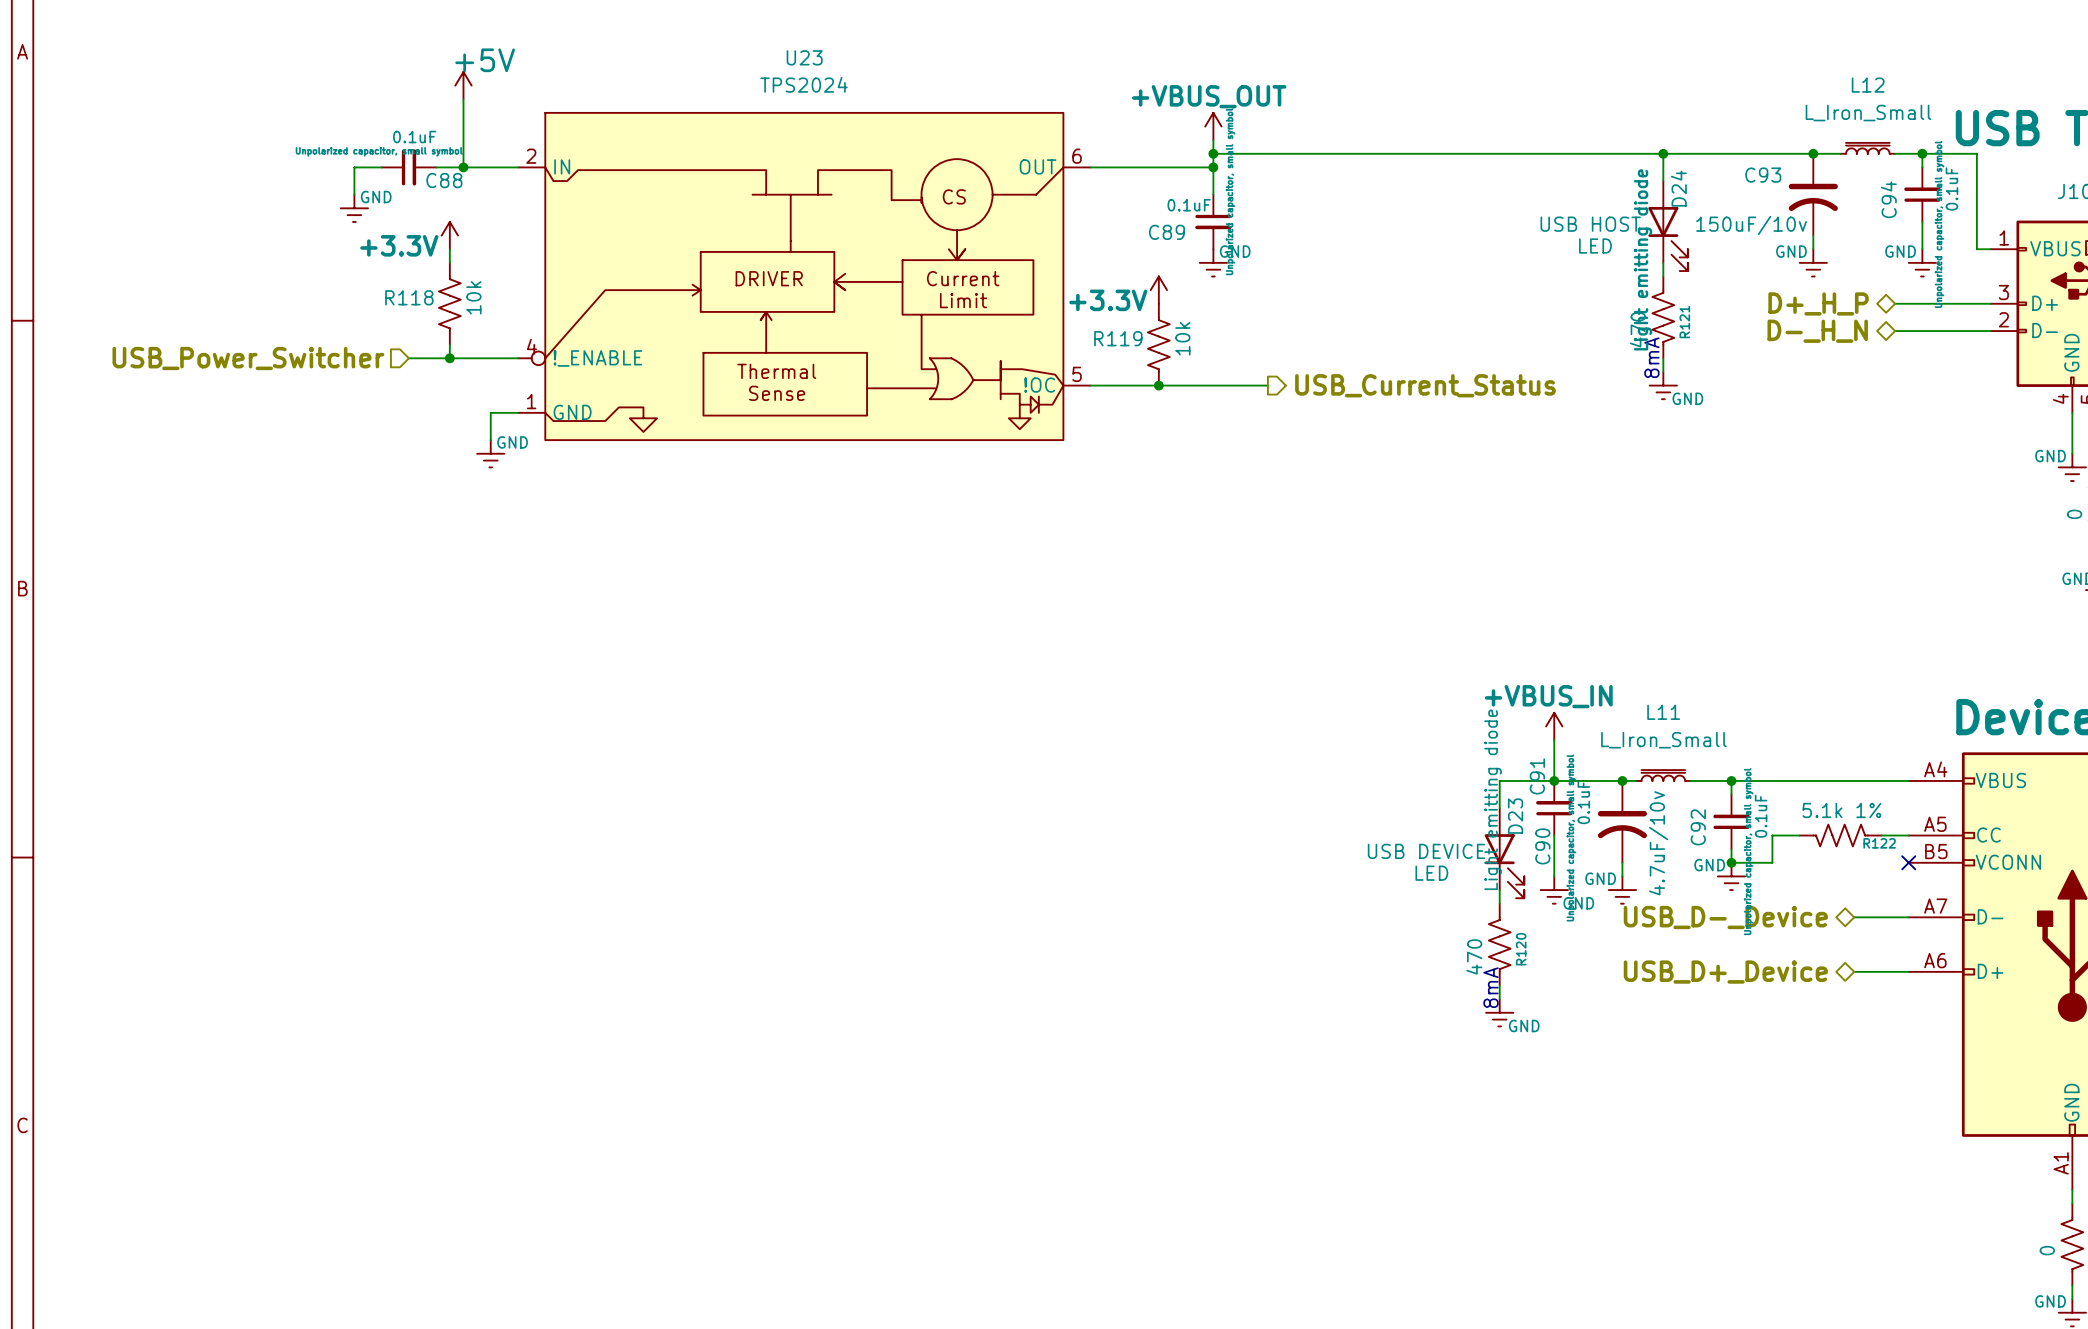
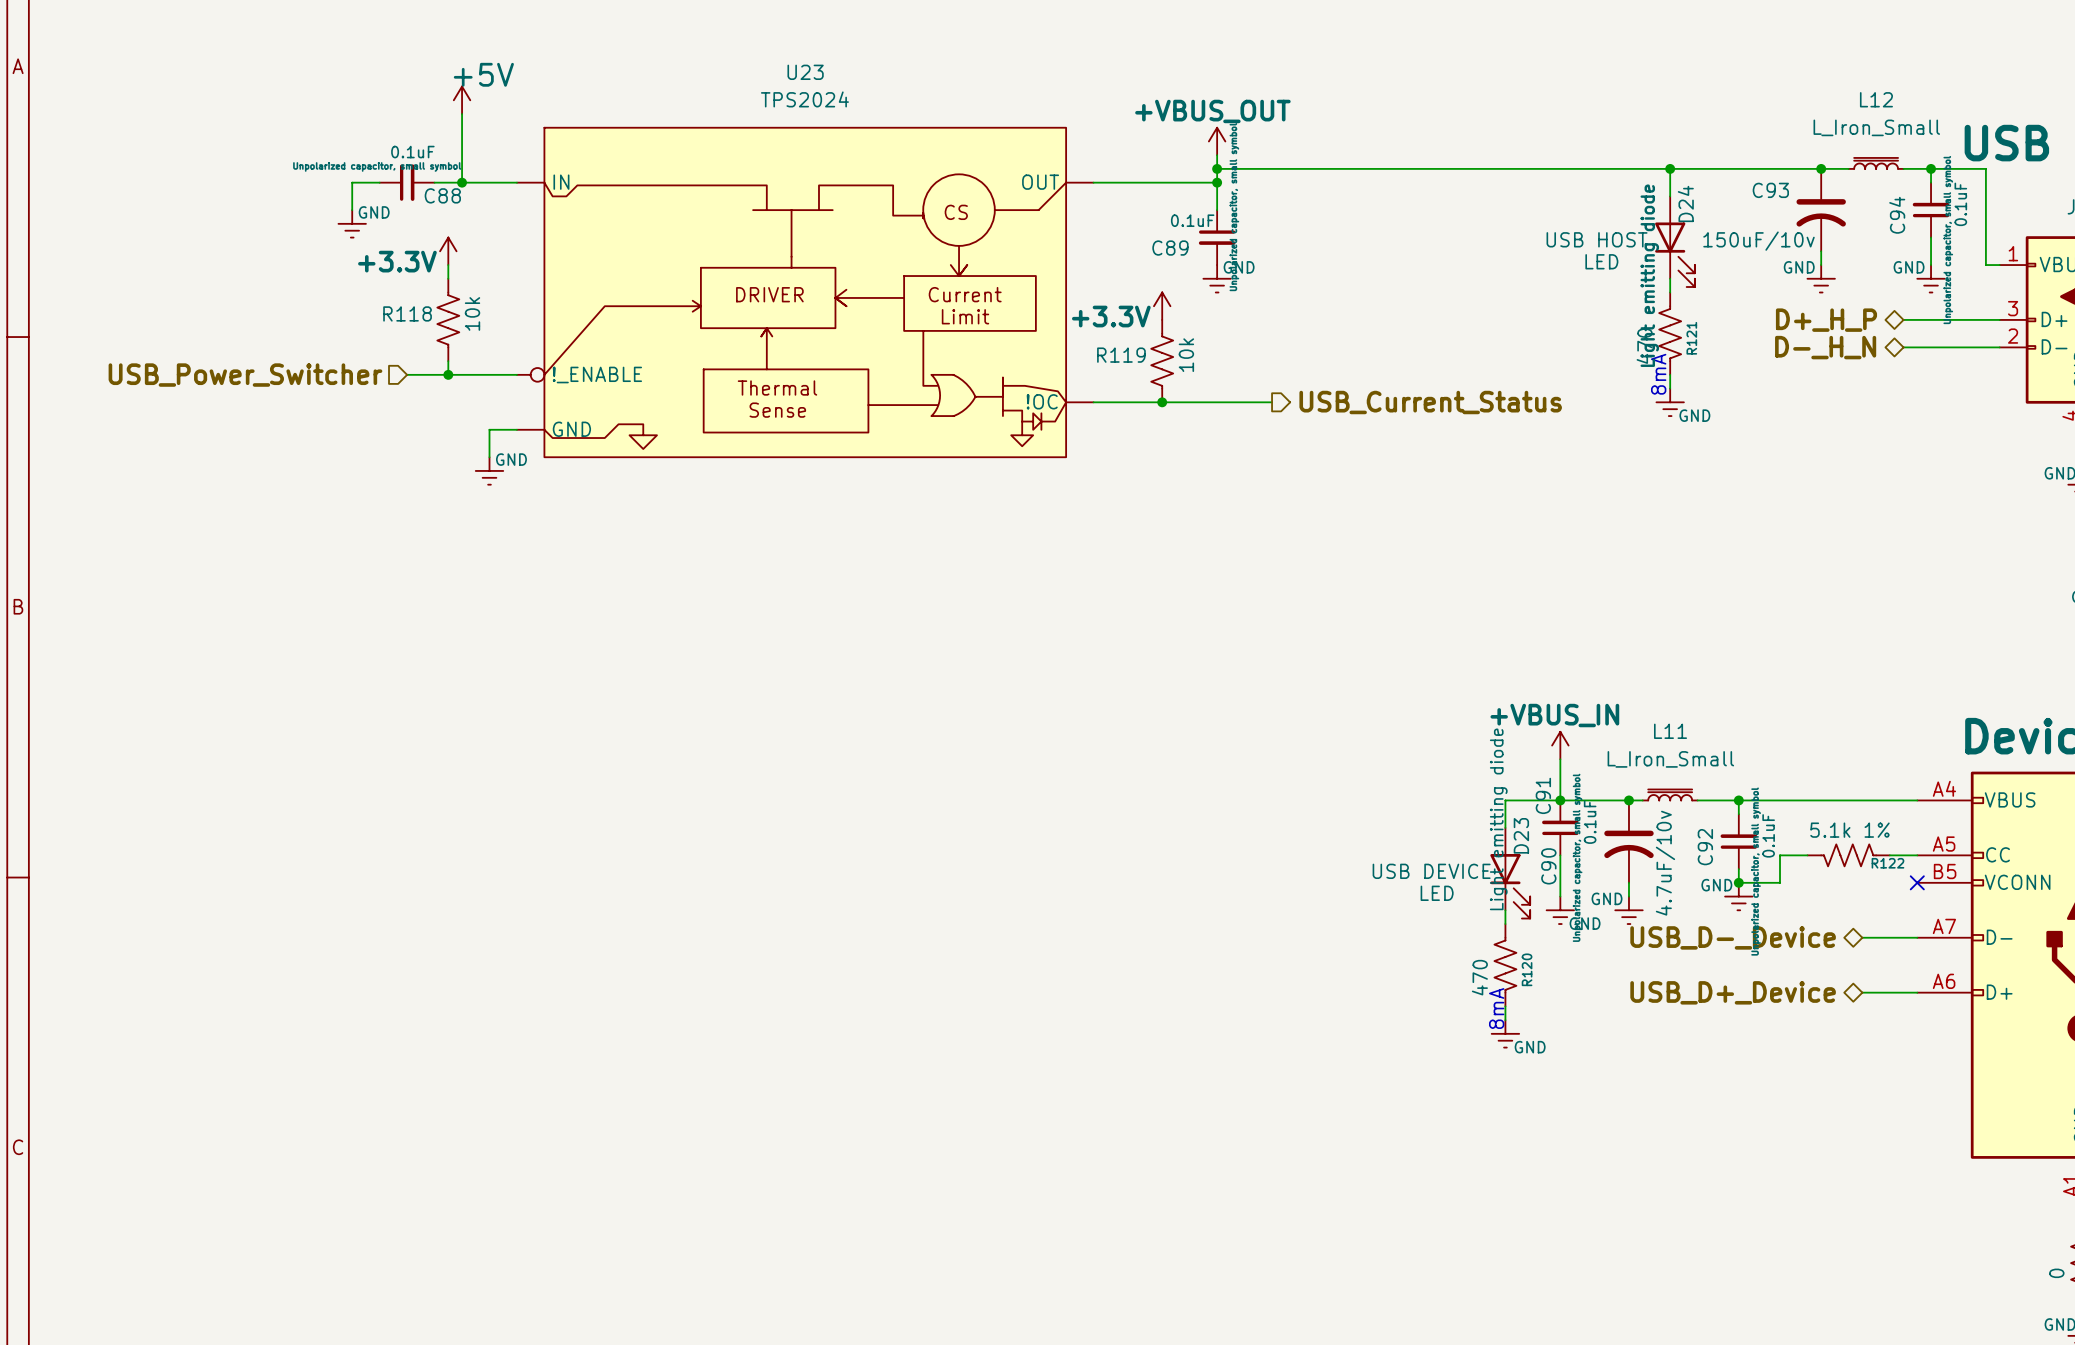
U23 pin number: 2 (531, 156) -> none
U23 pin number: 6 (1077, 156) -> none
U23 pin number: 4 (531, 346) -> none
U23 pin number: 5 (1077, 374) -> none
U23 pin number: 1 (531, 401) -> none

